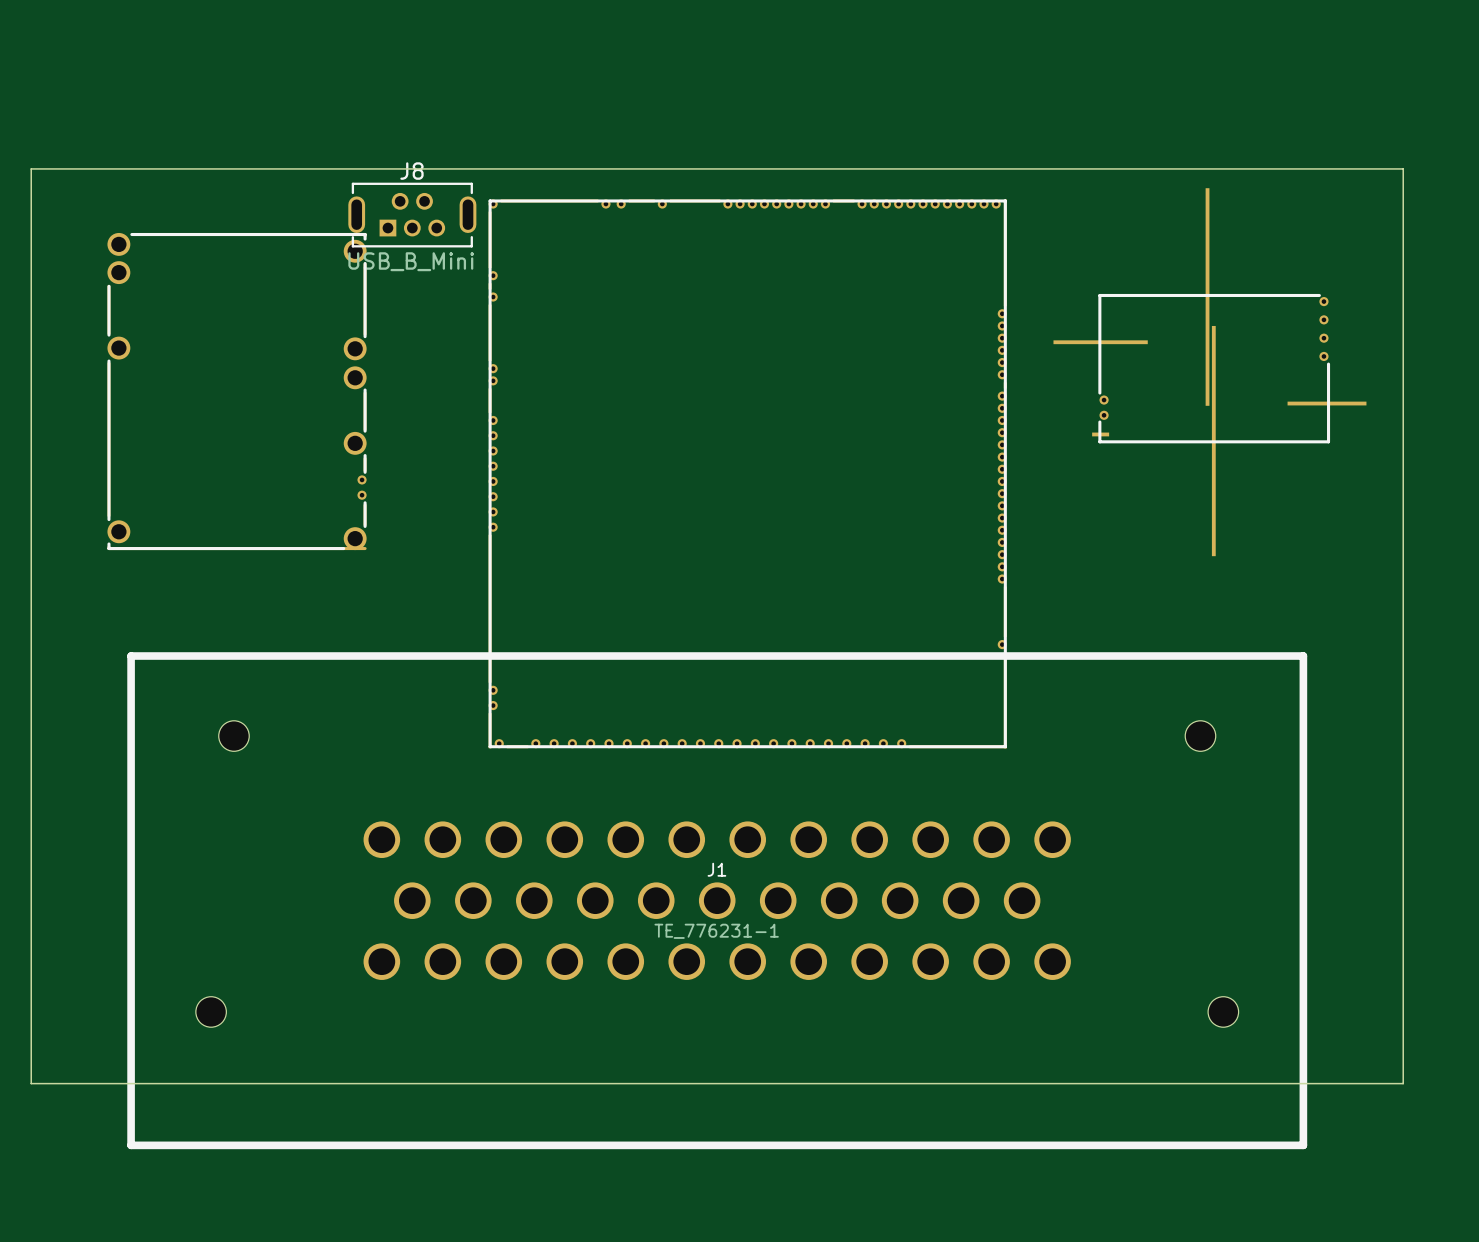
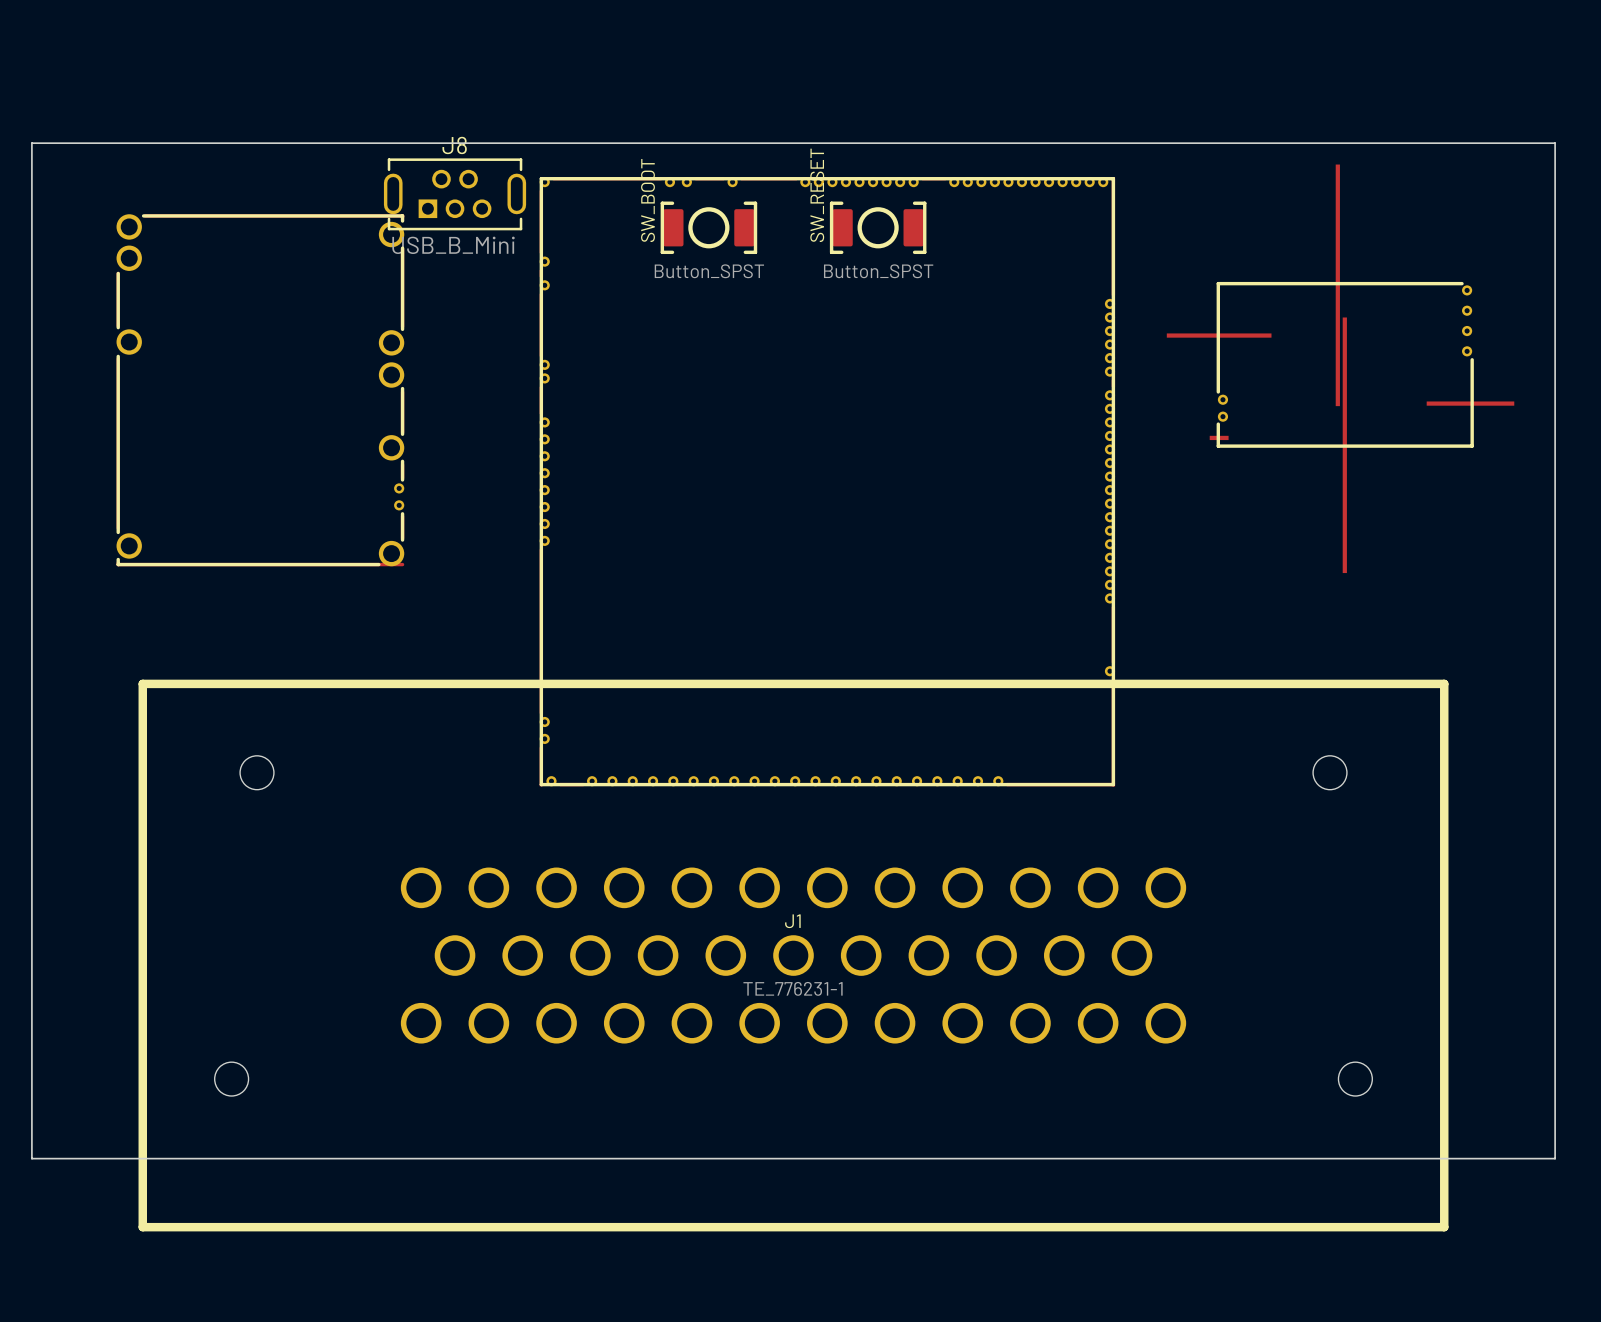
SW_BOOT: none -> Button_SPST (708, 227)
SW_RESET: none -> Button_SPST (878, 227)

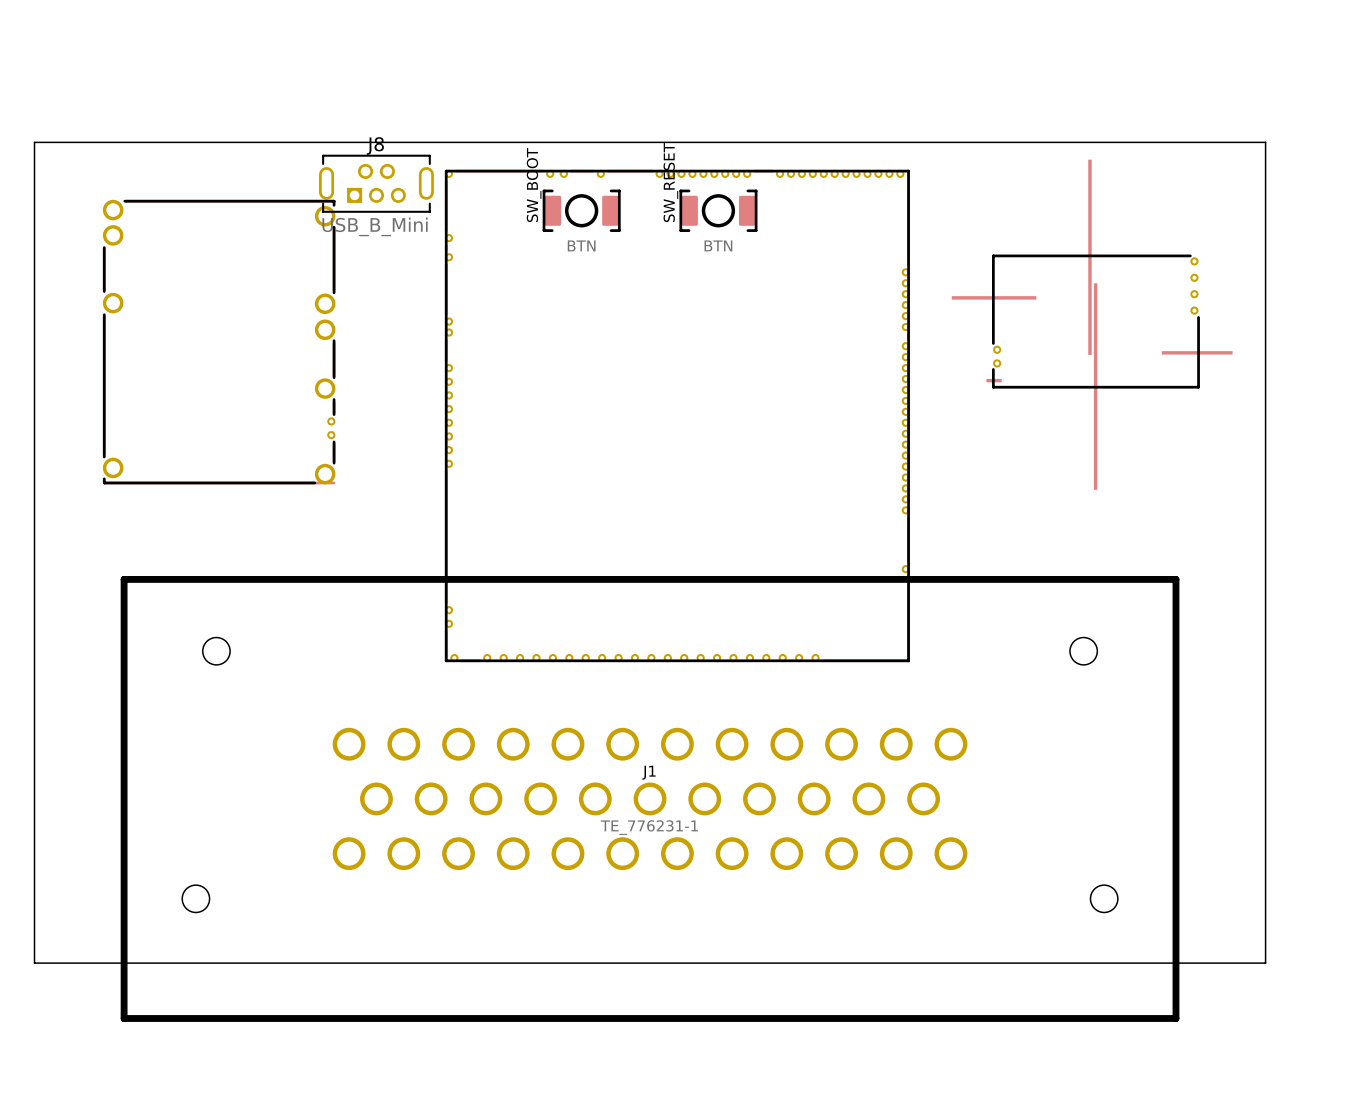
SW_BOOT value: Button_SPST (709, 271) -> BTN (581, 245)
SW_RESET value: Button_SPST (878, 271) -> BTN (718, 245)

